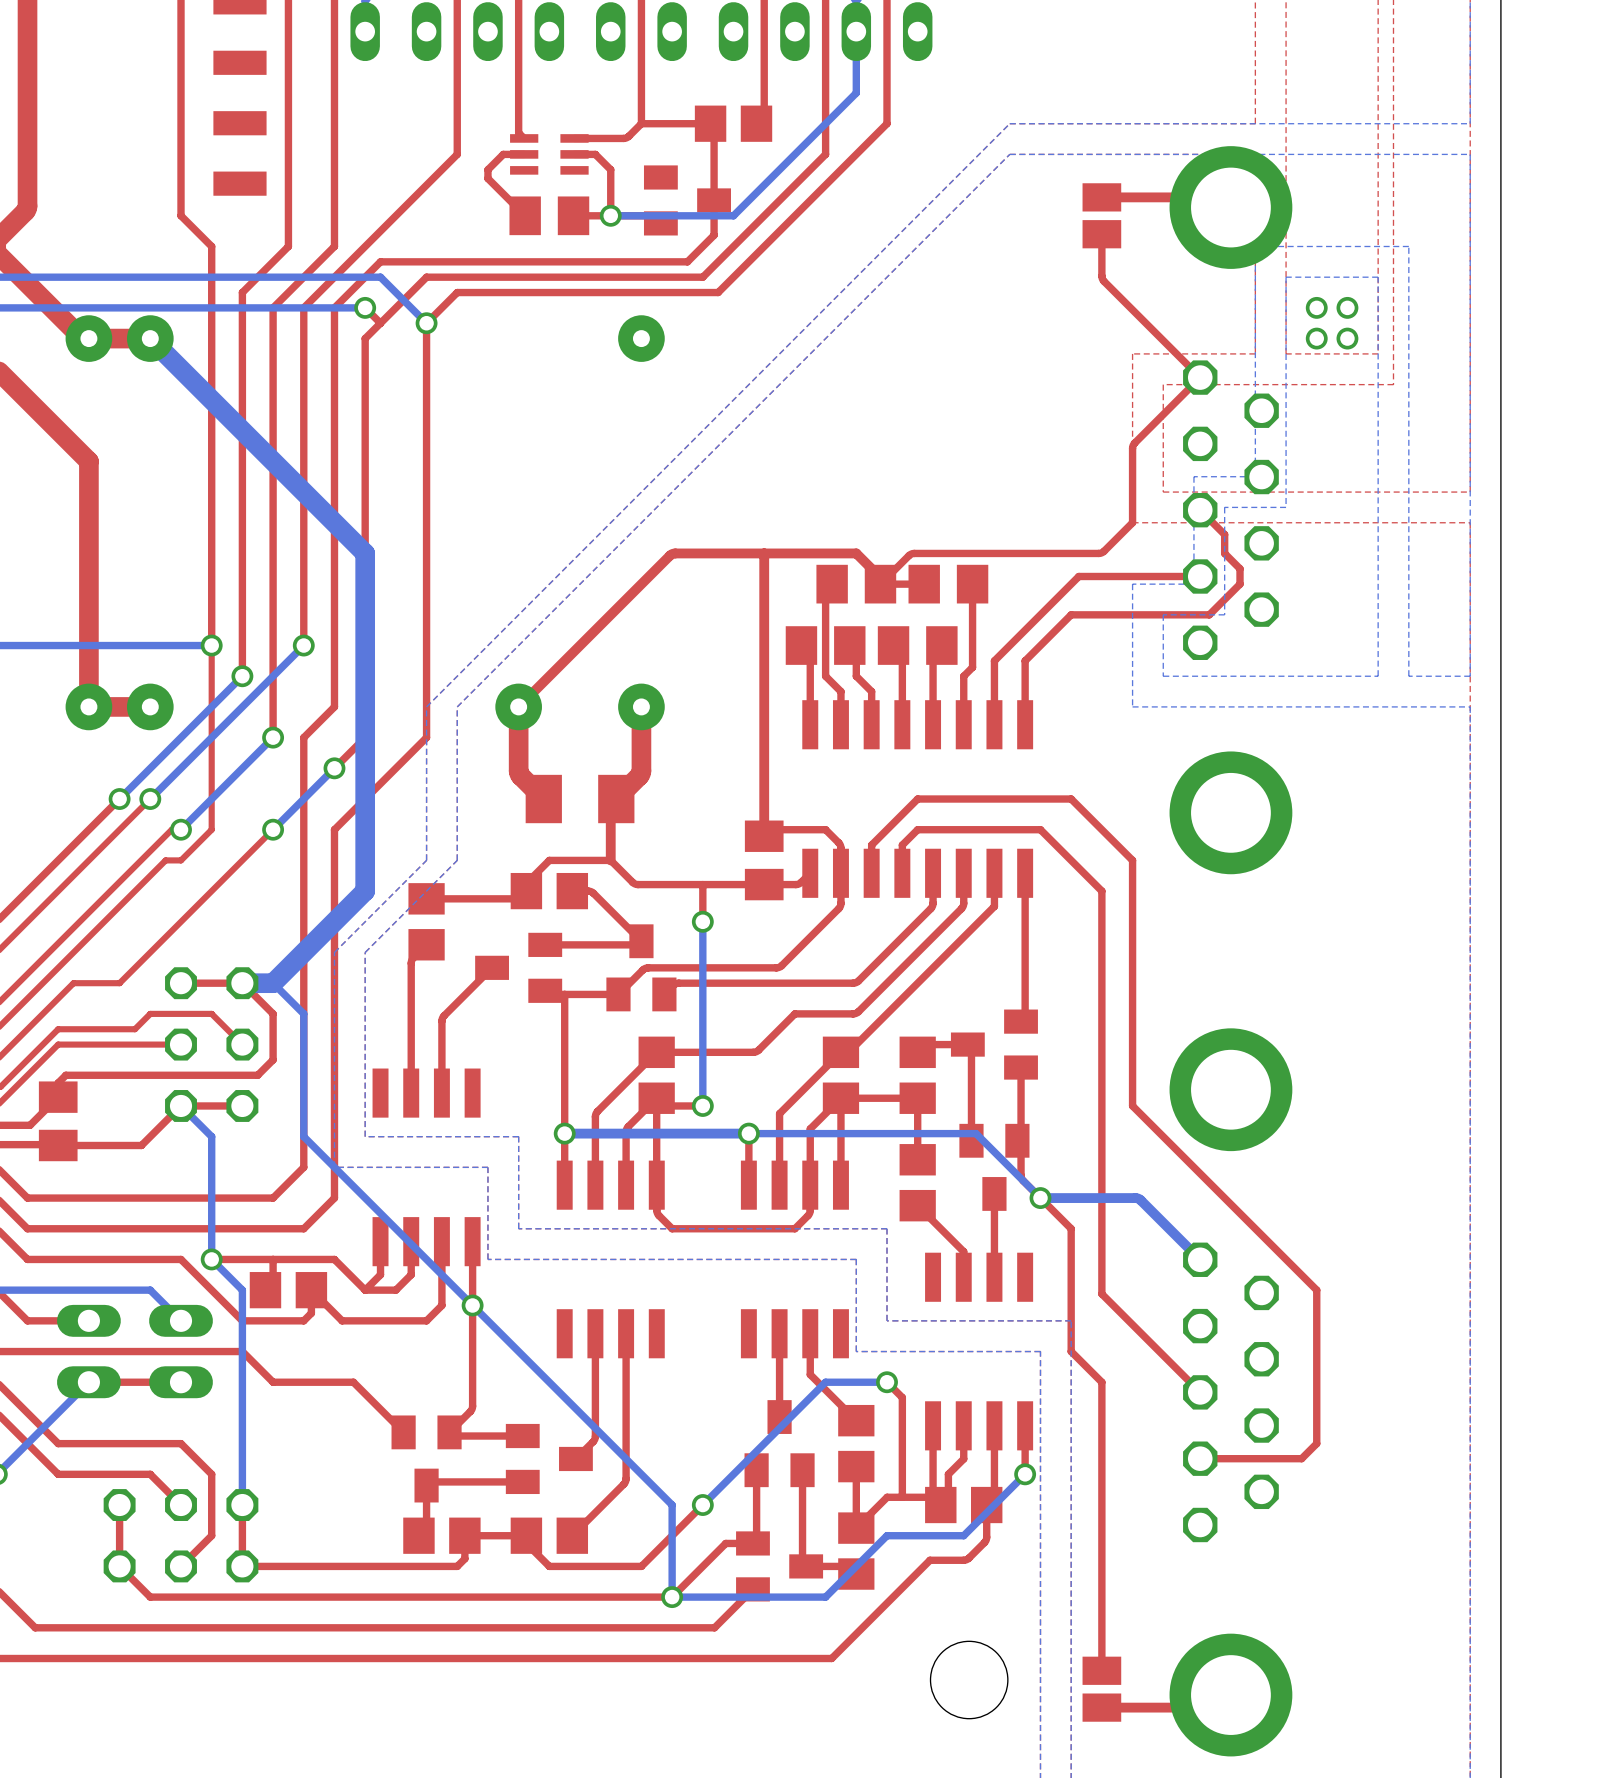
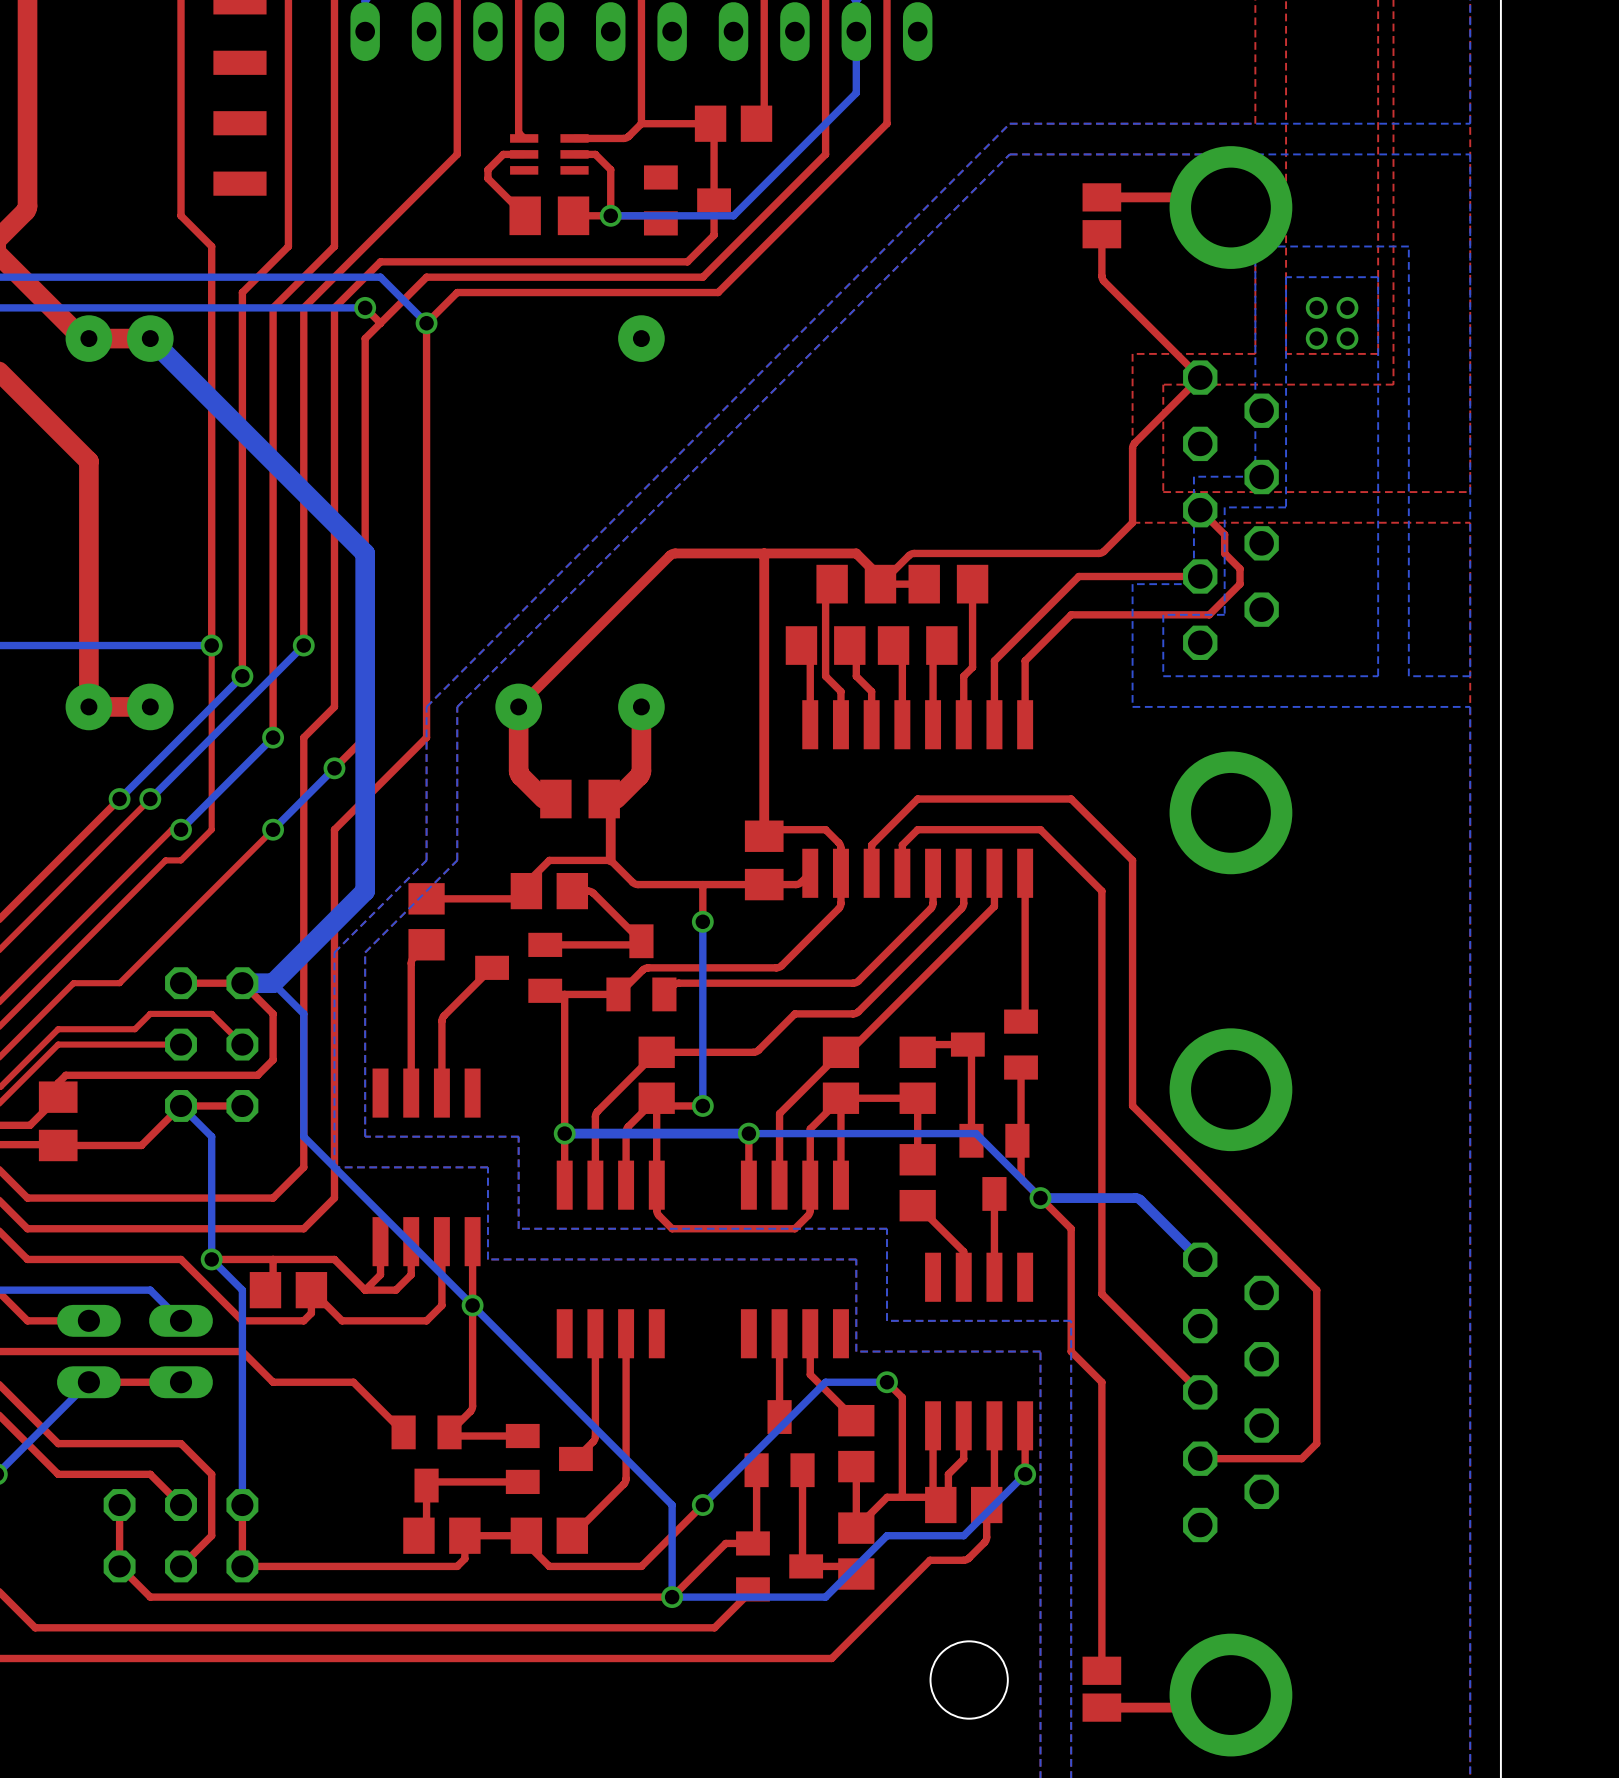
part footprint: [525, 774, 635, 824] -> [540, 779, 620, 819]

